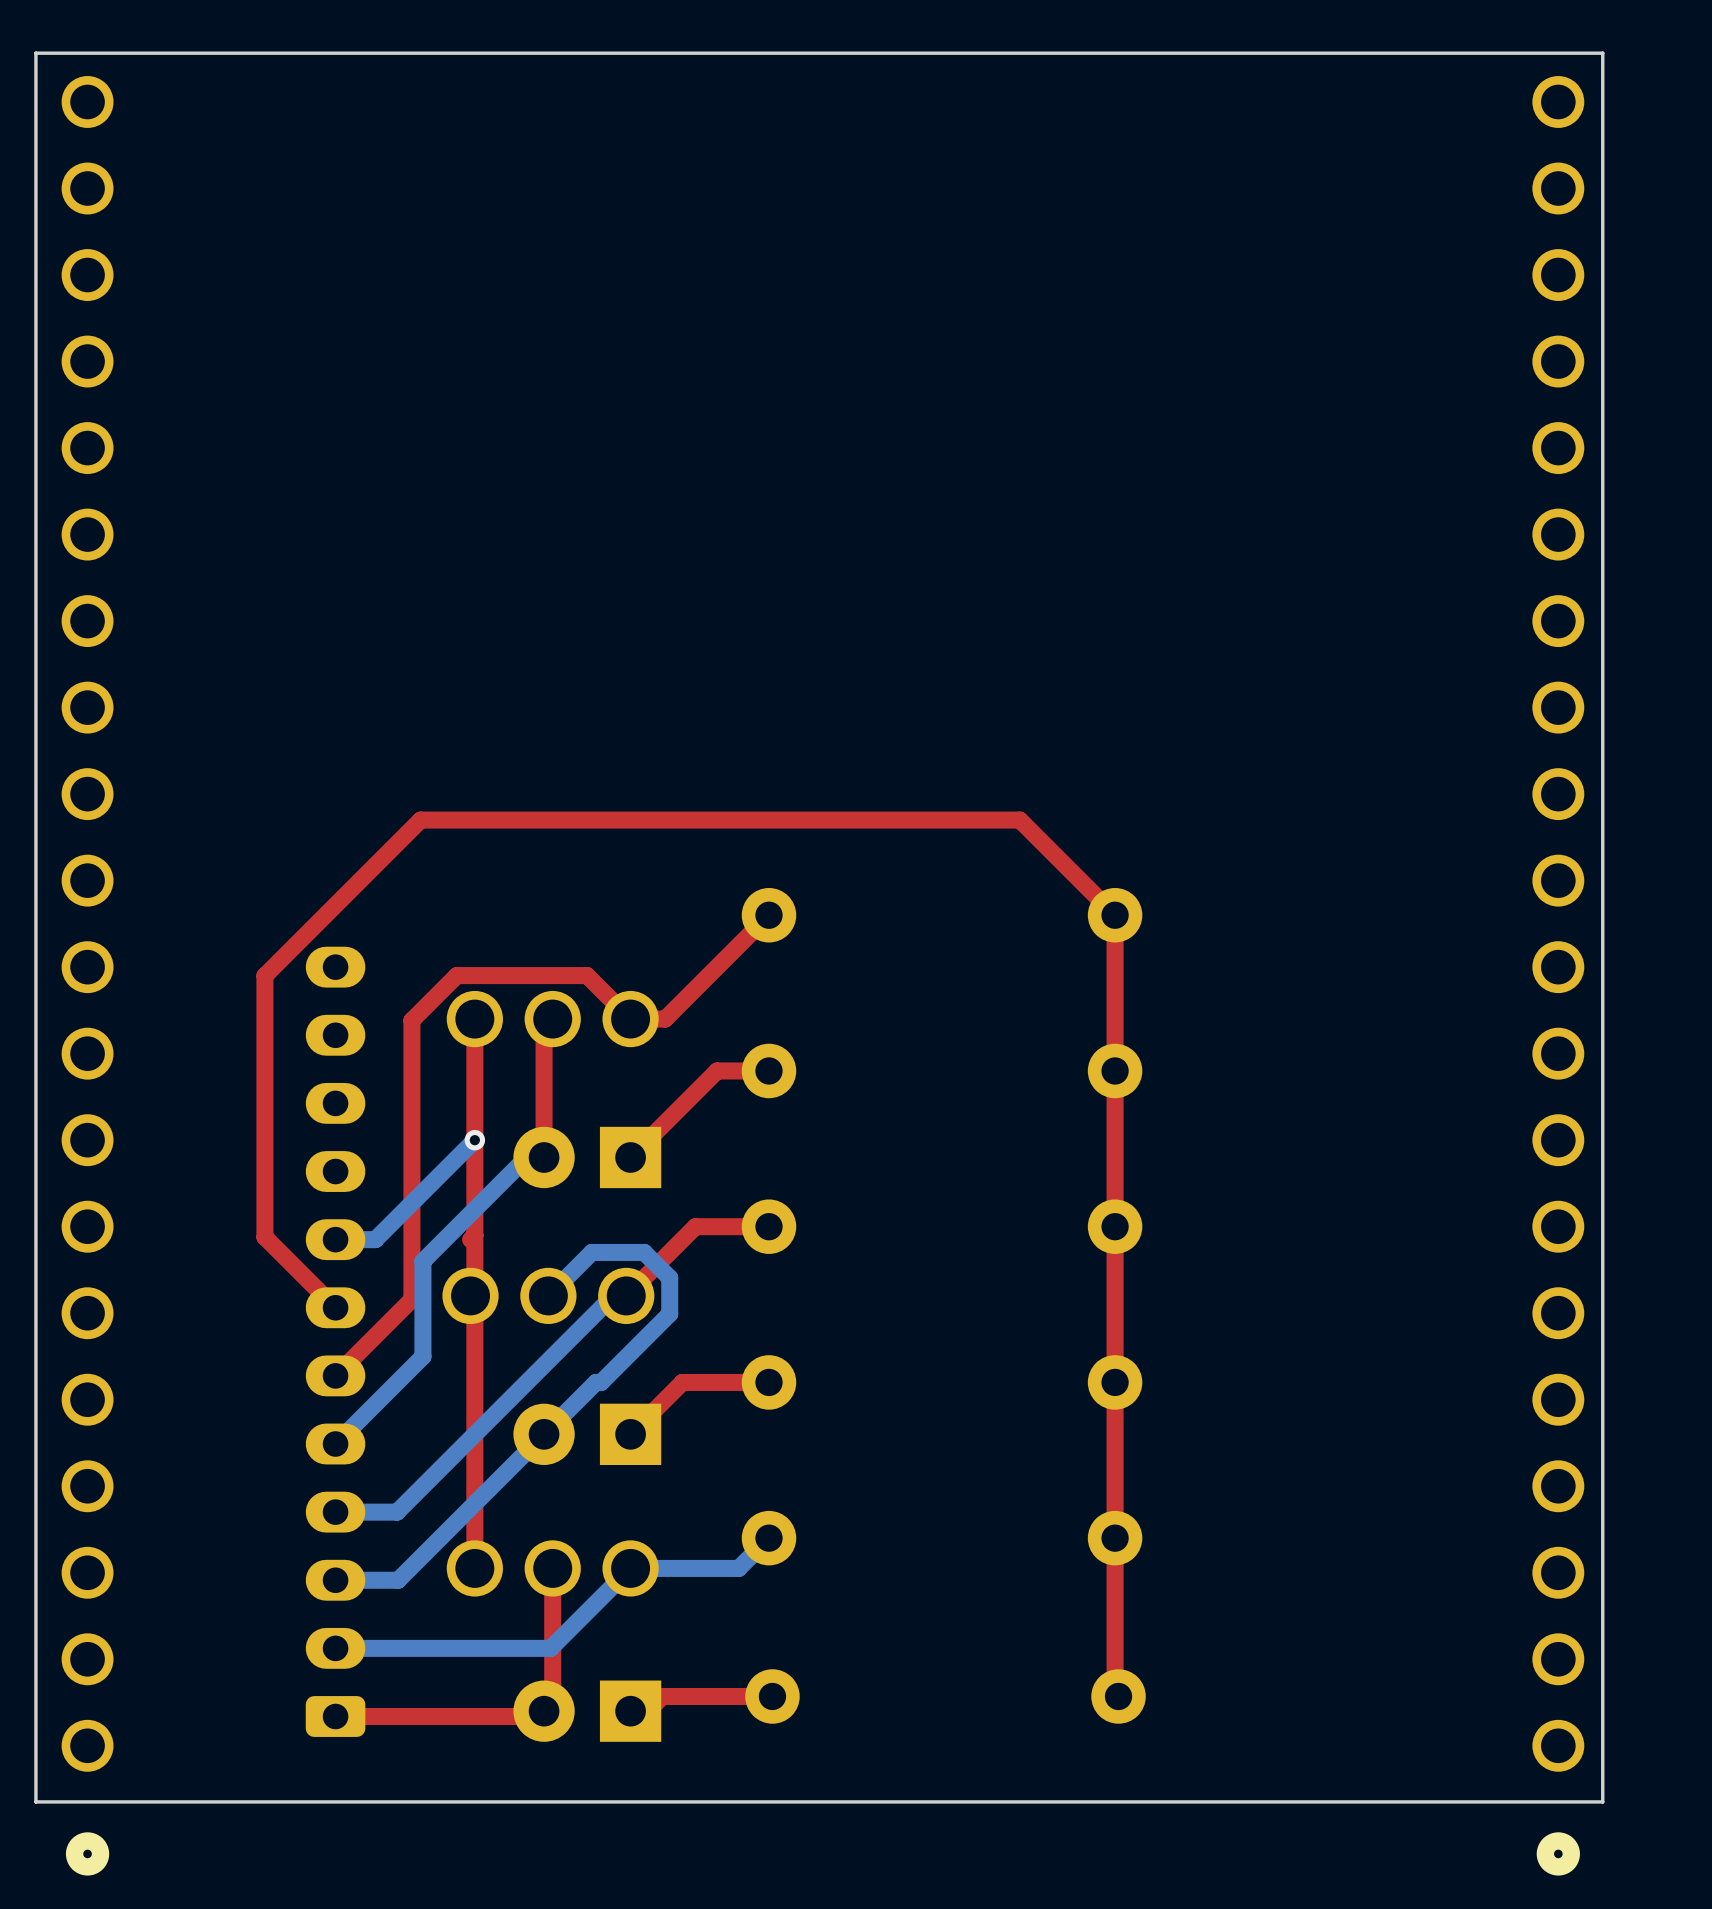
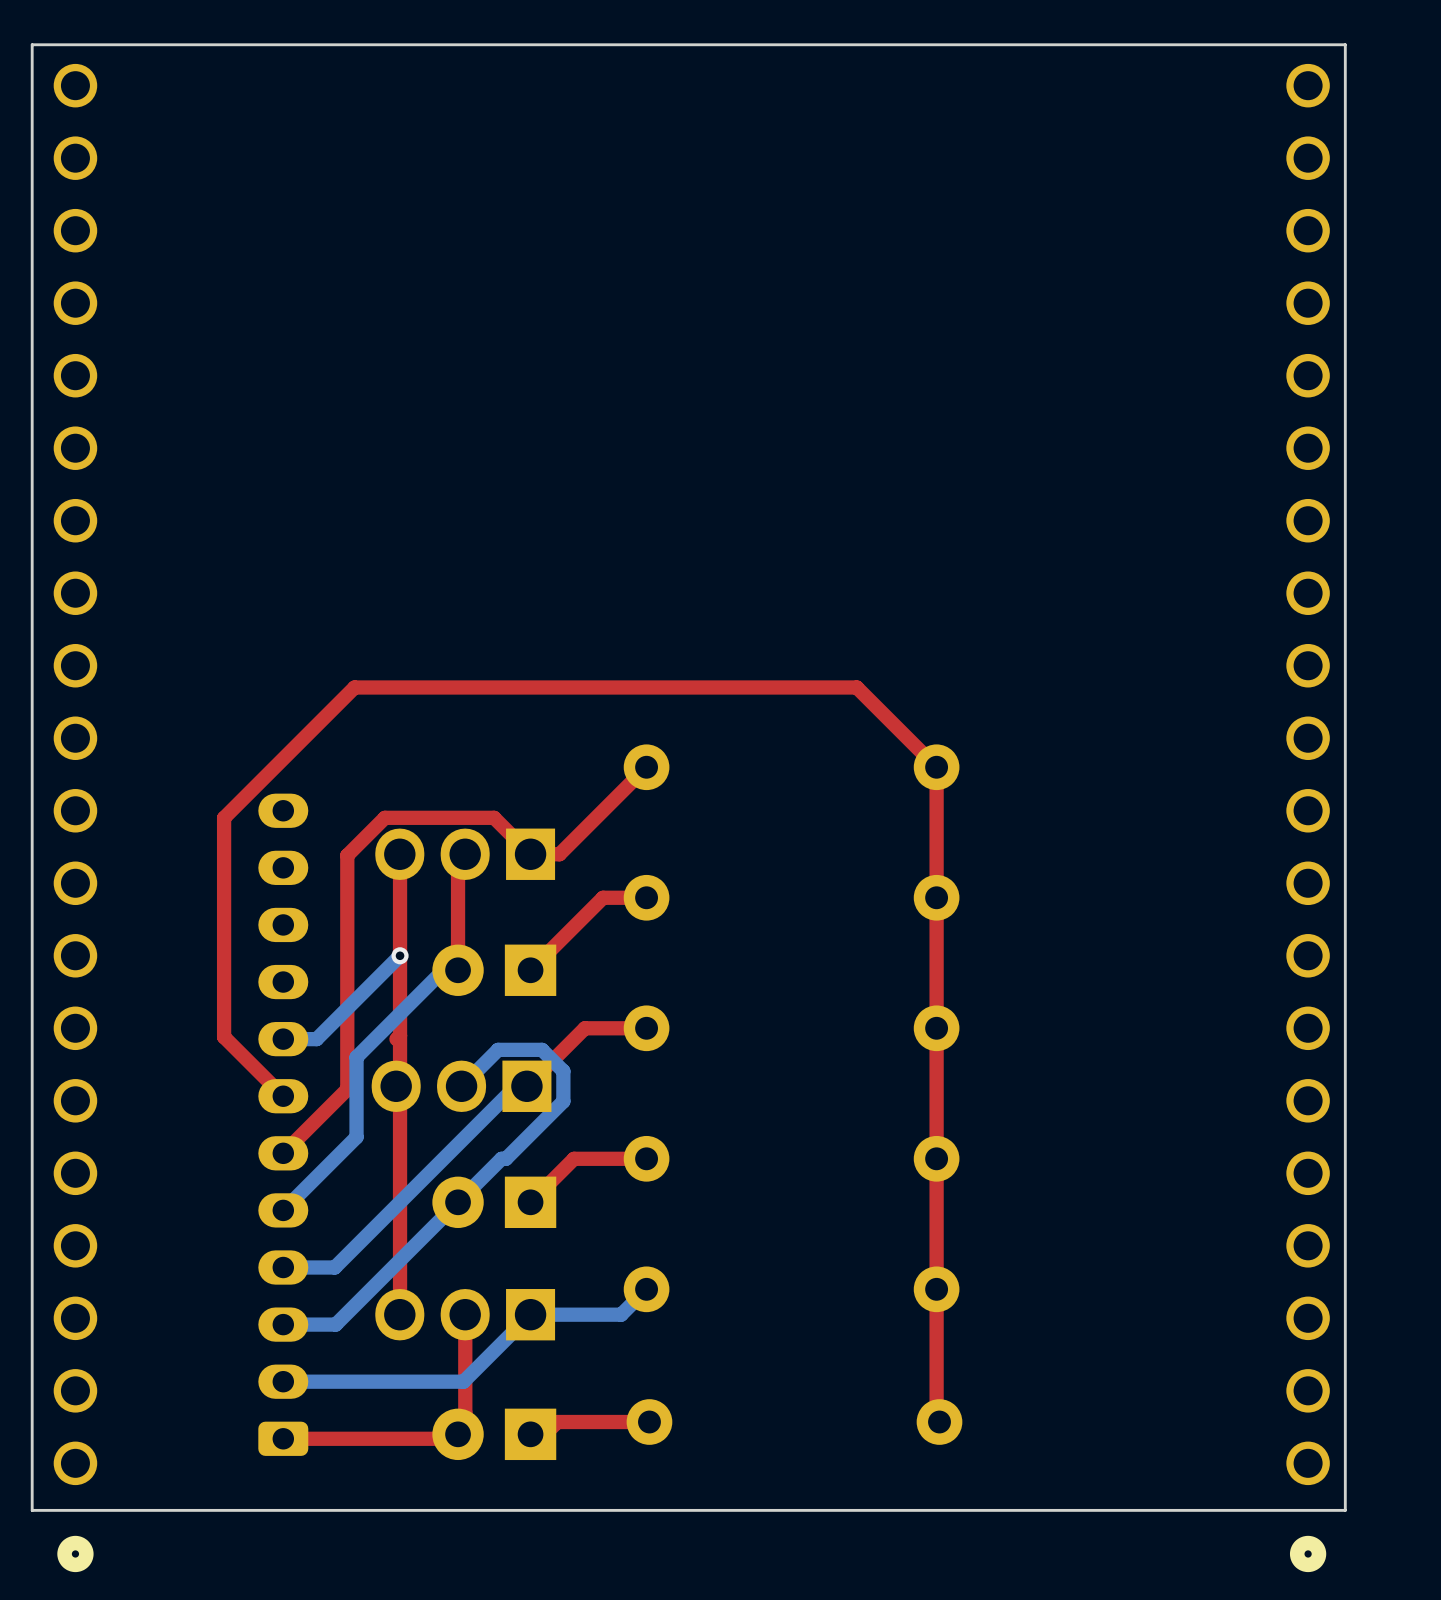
part footprint: [446, 990, 659, 1048] -> [375, 828, 556, 880]
part footprint: [442, 1267, 655, 1325] -> [371, 1060, 552, 1112]
part footprint: [446, 1540, 659, 1597] -> [375, 1289, 556, 1341]

